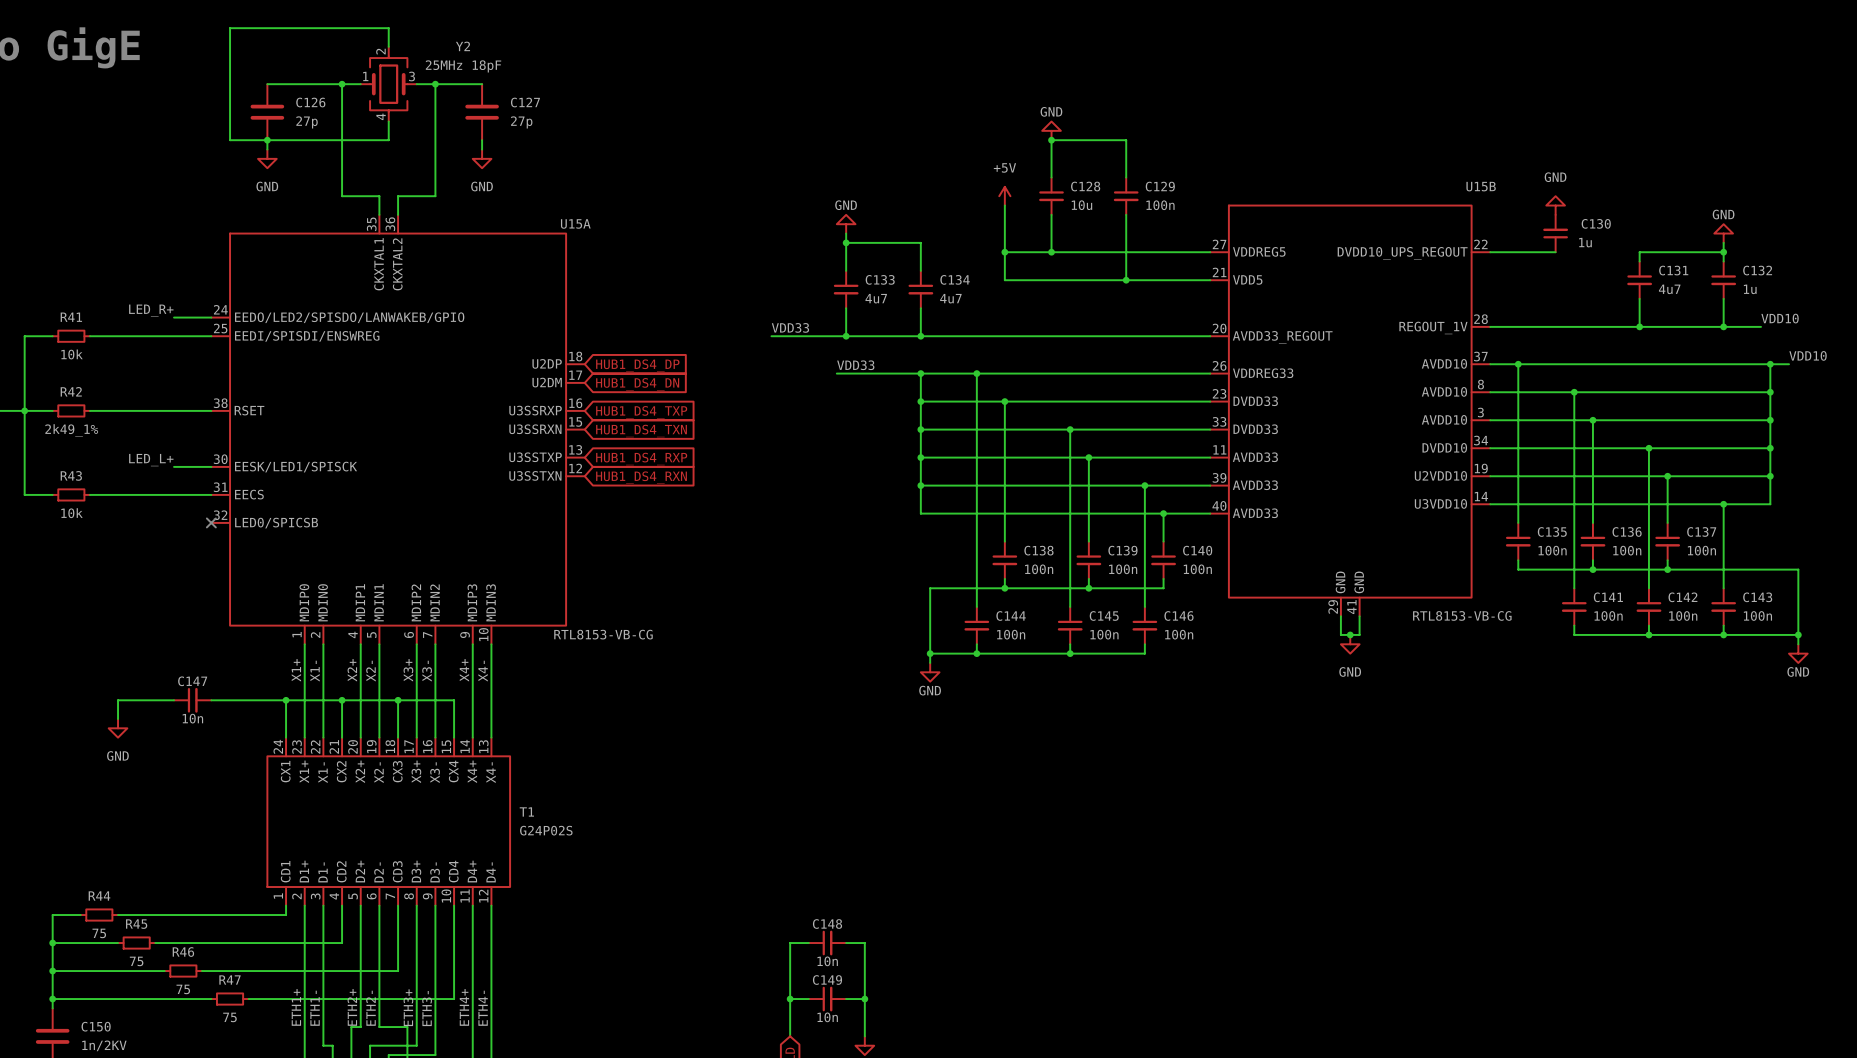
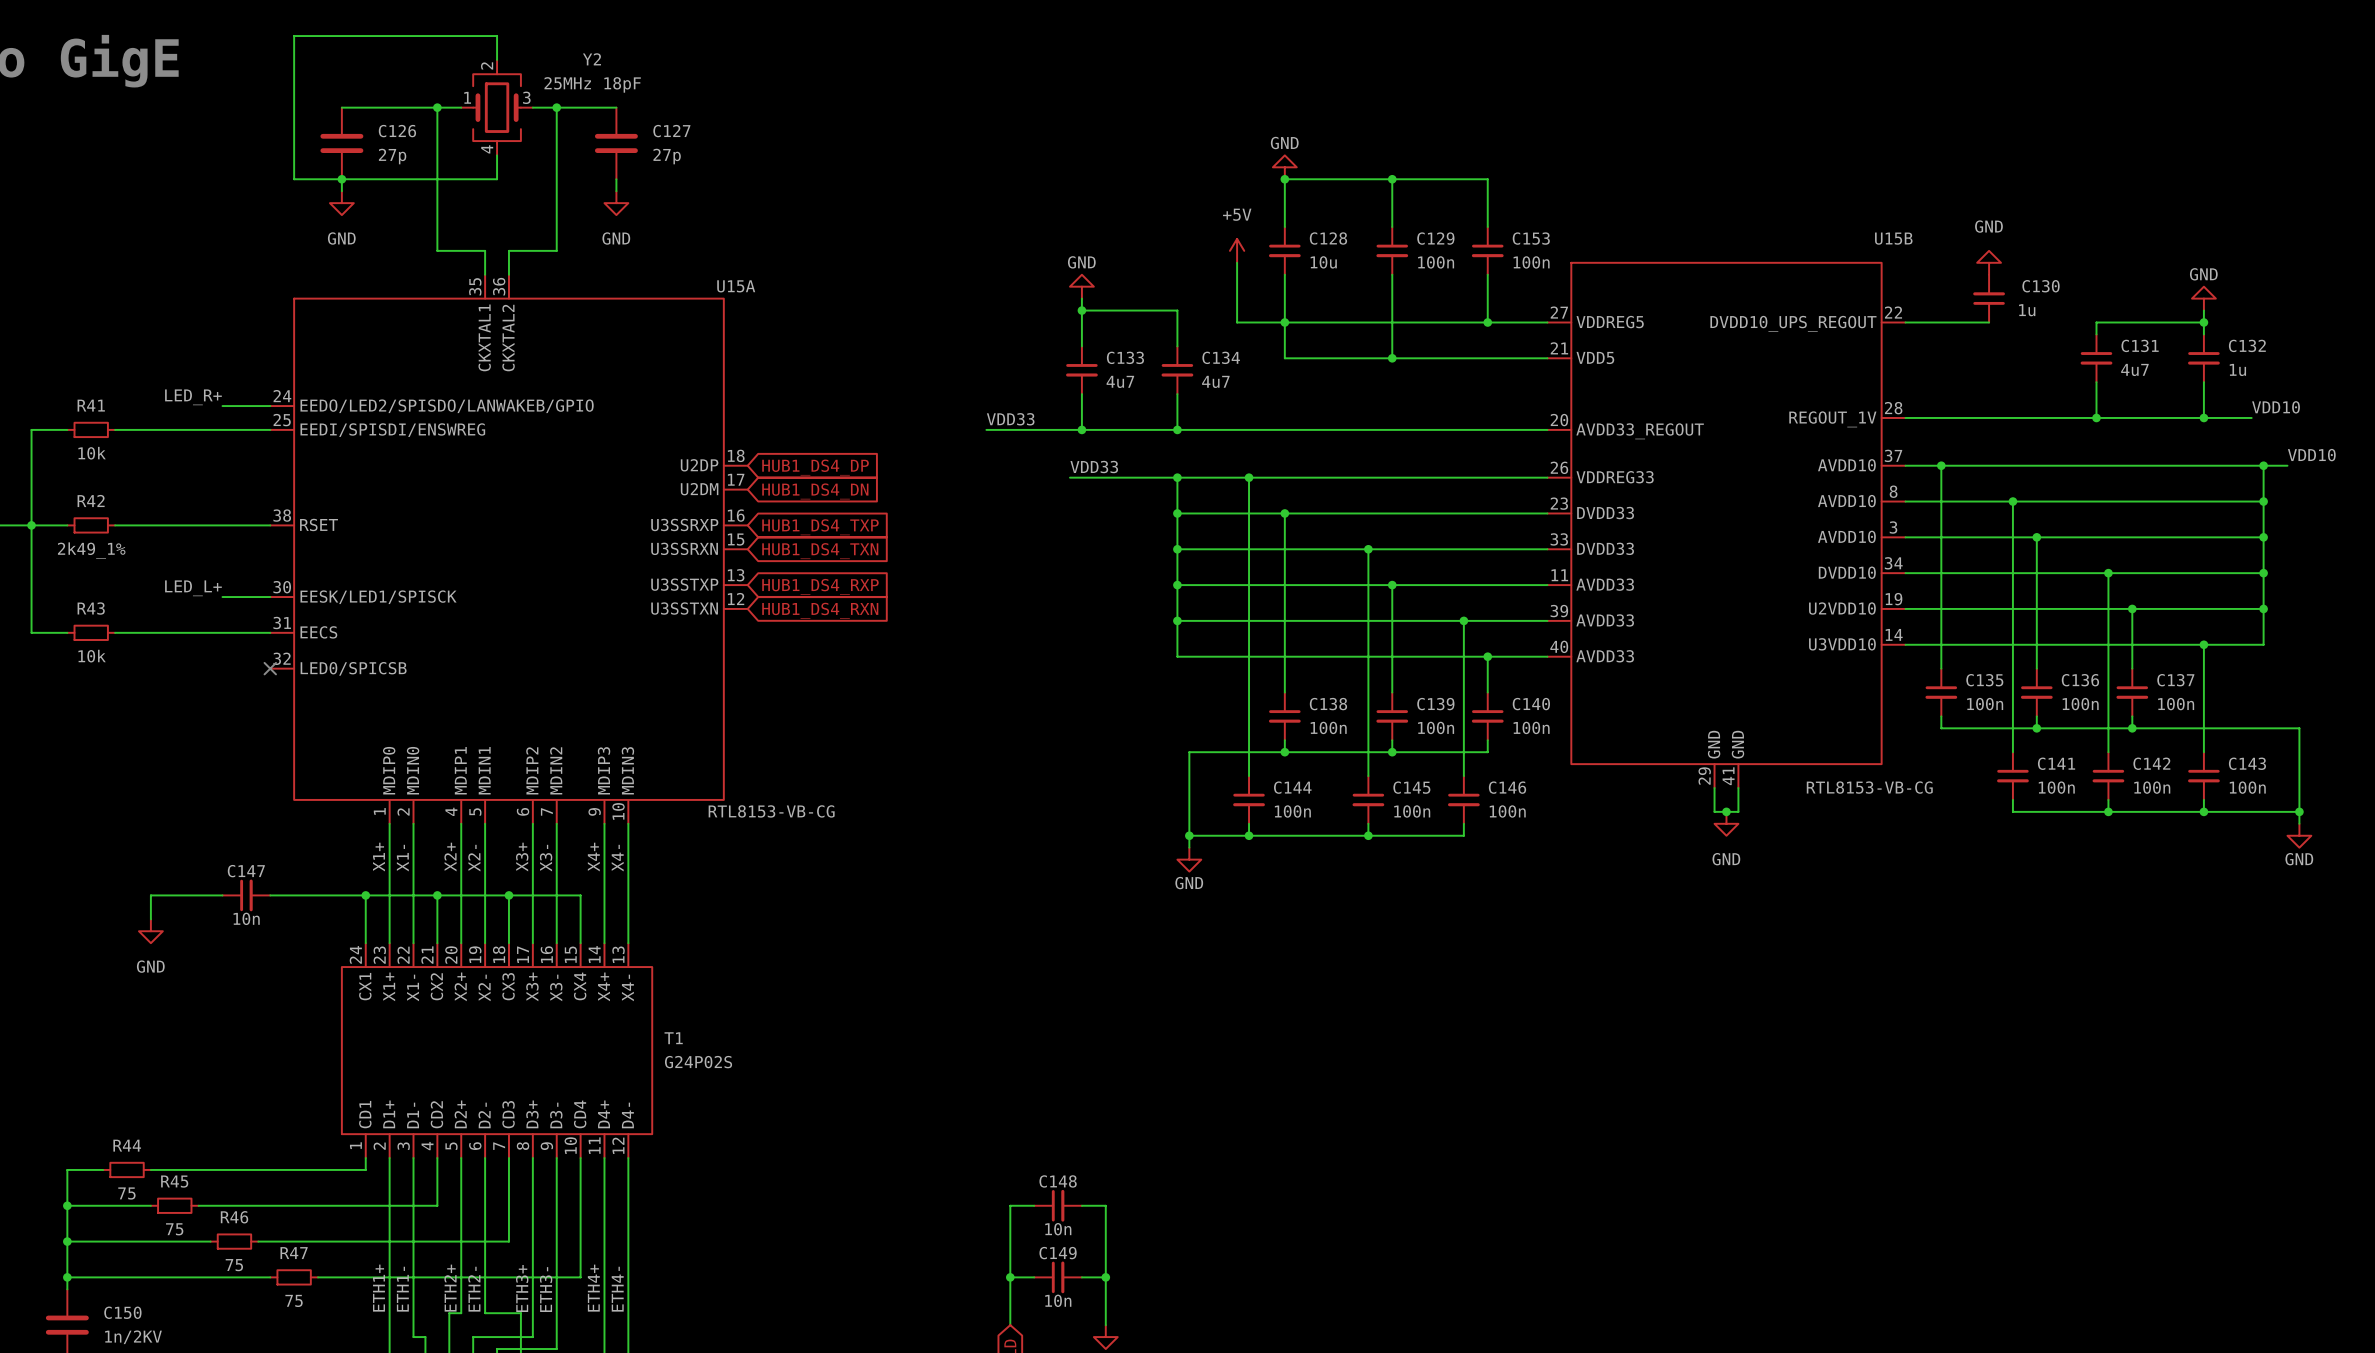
power symbol position: GND (1051, 130) -> GND (1284, 167)
junction: none -> (1284, 179)
wire: (1051, 140) (1051, 177) -> (1344, 179) (1284, 179) (1284, 227)
junction: (1051, 140) -> none
junction: none -> (1392, 179)
wire: (1126, 140) (1126, 177) -> (1440, 179) (1487, 179) (1487, 227)
power symbol position: +5V (1004, 196) -> +5V (1237, 250)
C128 position: (1051, 196) -> (1284, 250)
C129 position: (1126, 196) -> (1392, 250)
C153: none -> 100n (1487, 250)
wire: none -> (1237, 262) (1237, 322) (1284, 322)
wire: (1051, 214) (1051, 252) -> (1392, 179) (1392, 227)
wire: (1126, 214) (1126, 280) -> (1392, 274) (1392, 358)
wire: none -> (1487, 274) (1487, 322)
junction: (1051, 252) -> none
junction: none -> (1487, 322)
junction: none -> (1392, 358)
junction: (1126, 280) -> none

